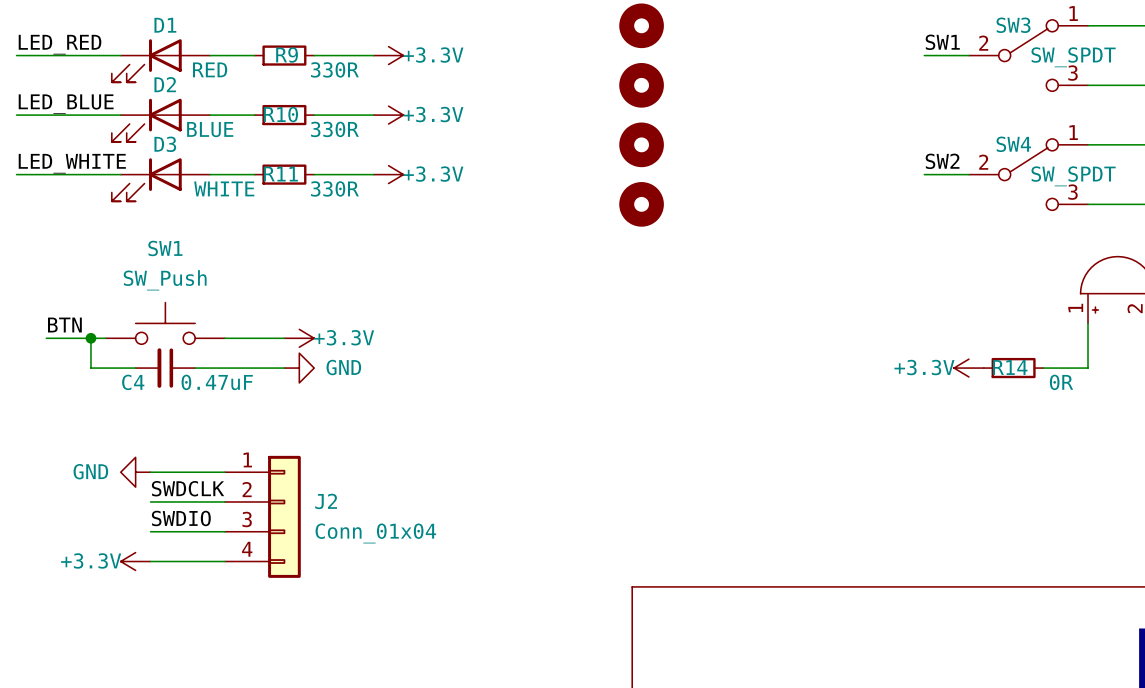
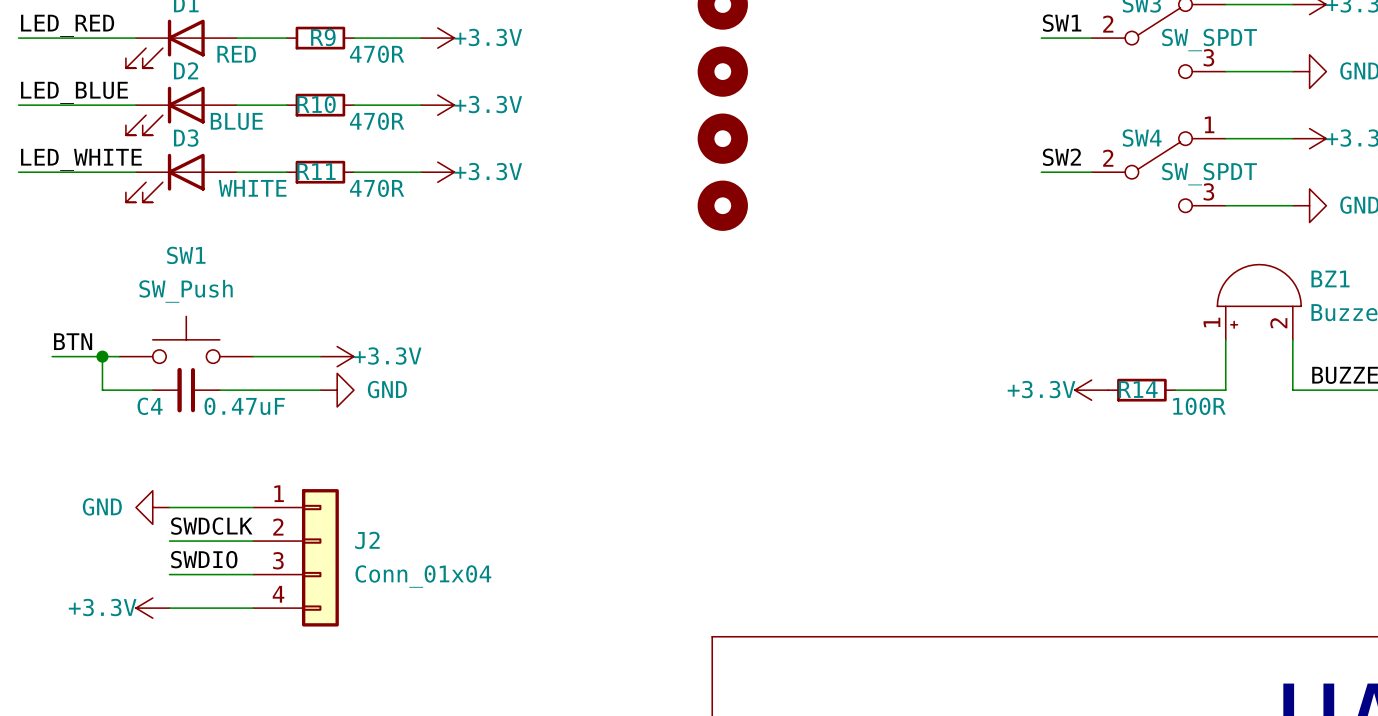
R9 value: 330R (334, 69) -> 470R (377, 54)
R10 value: 330R (334, 129) -> 470R (377, 121)
R11 value: 330R (334, 188) -> 470R (377, 188)
R14 value: 0R (1061, 382) -> 100R (1199, 406)

